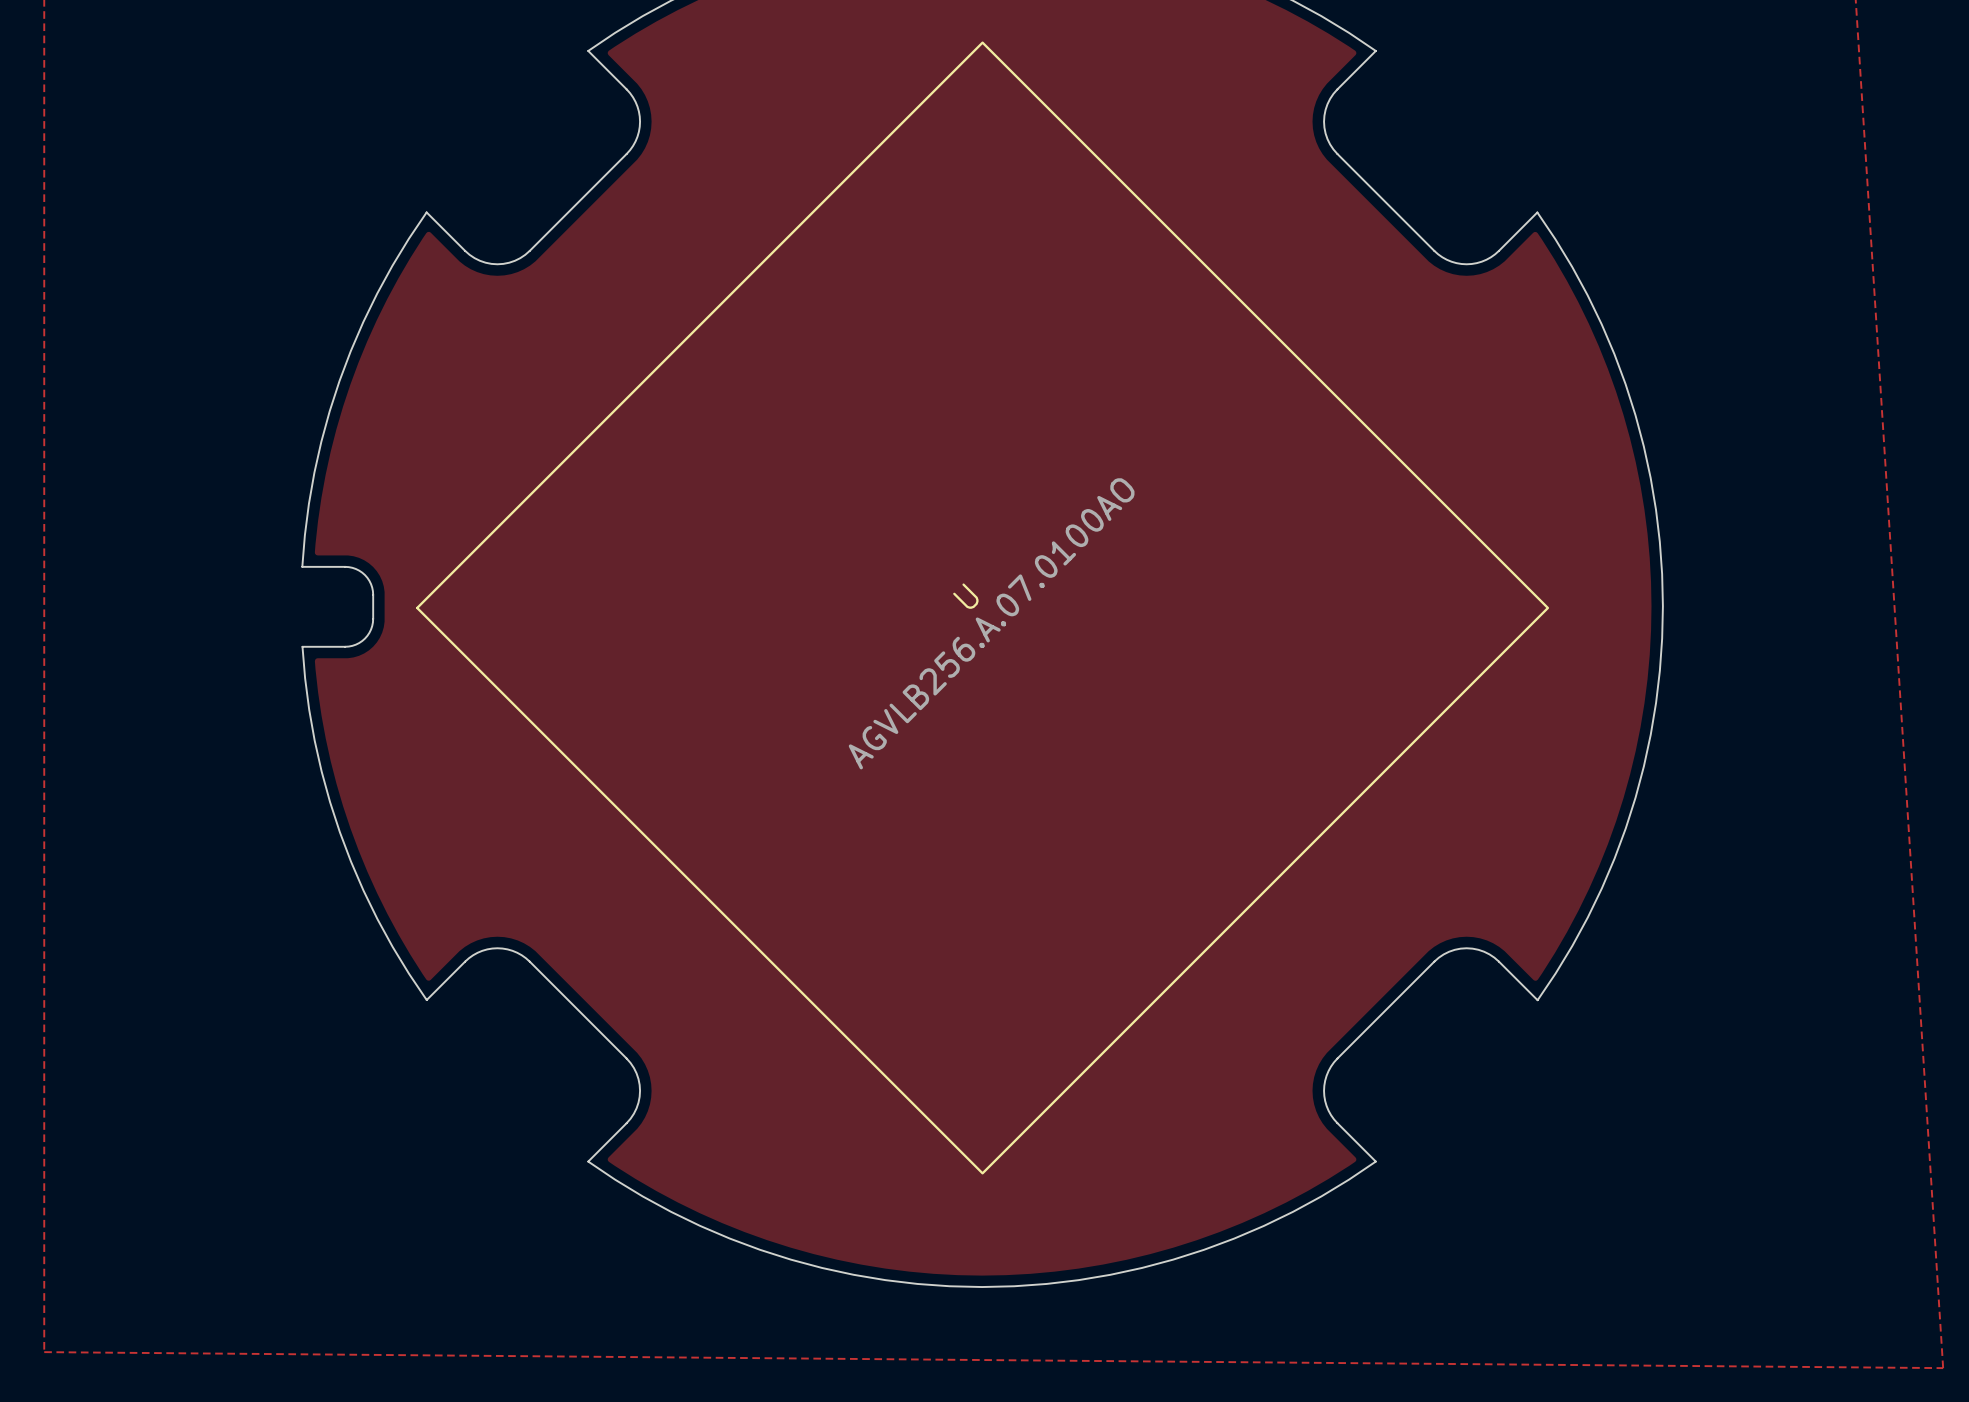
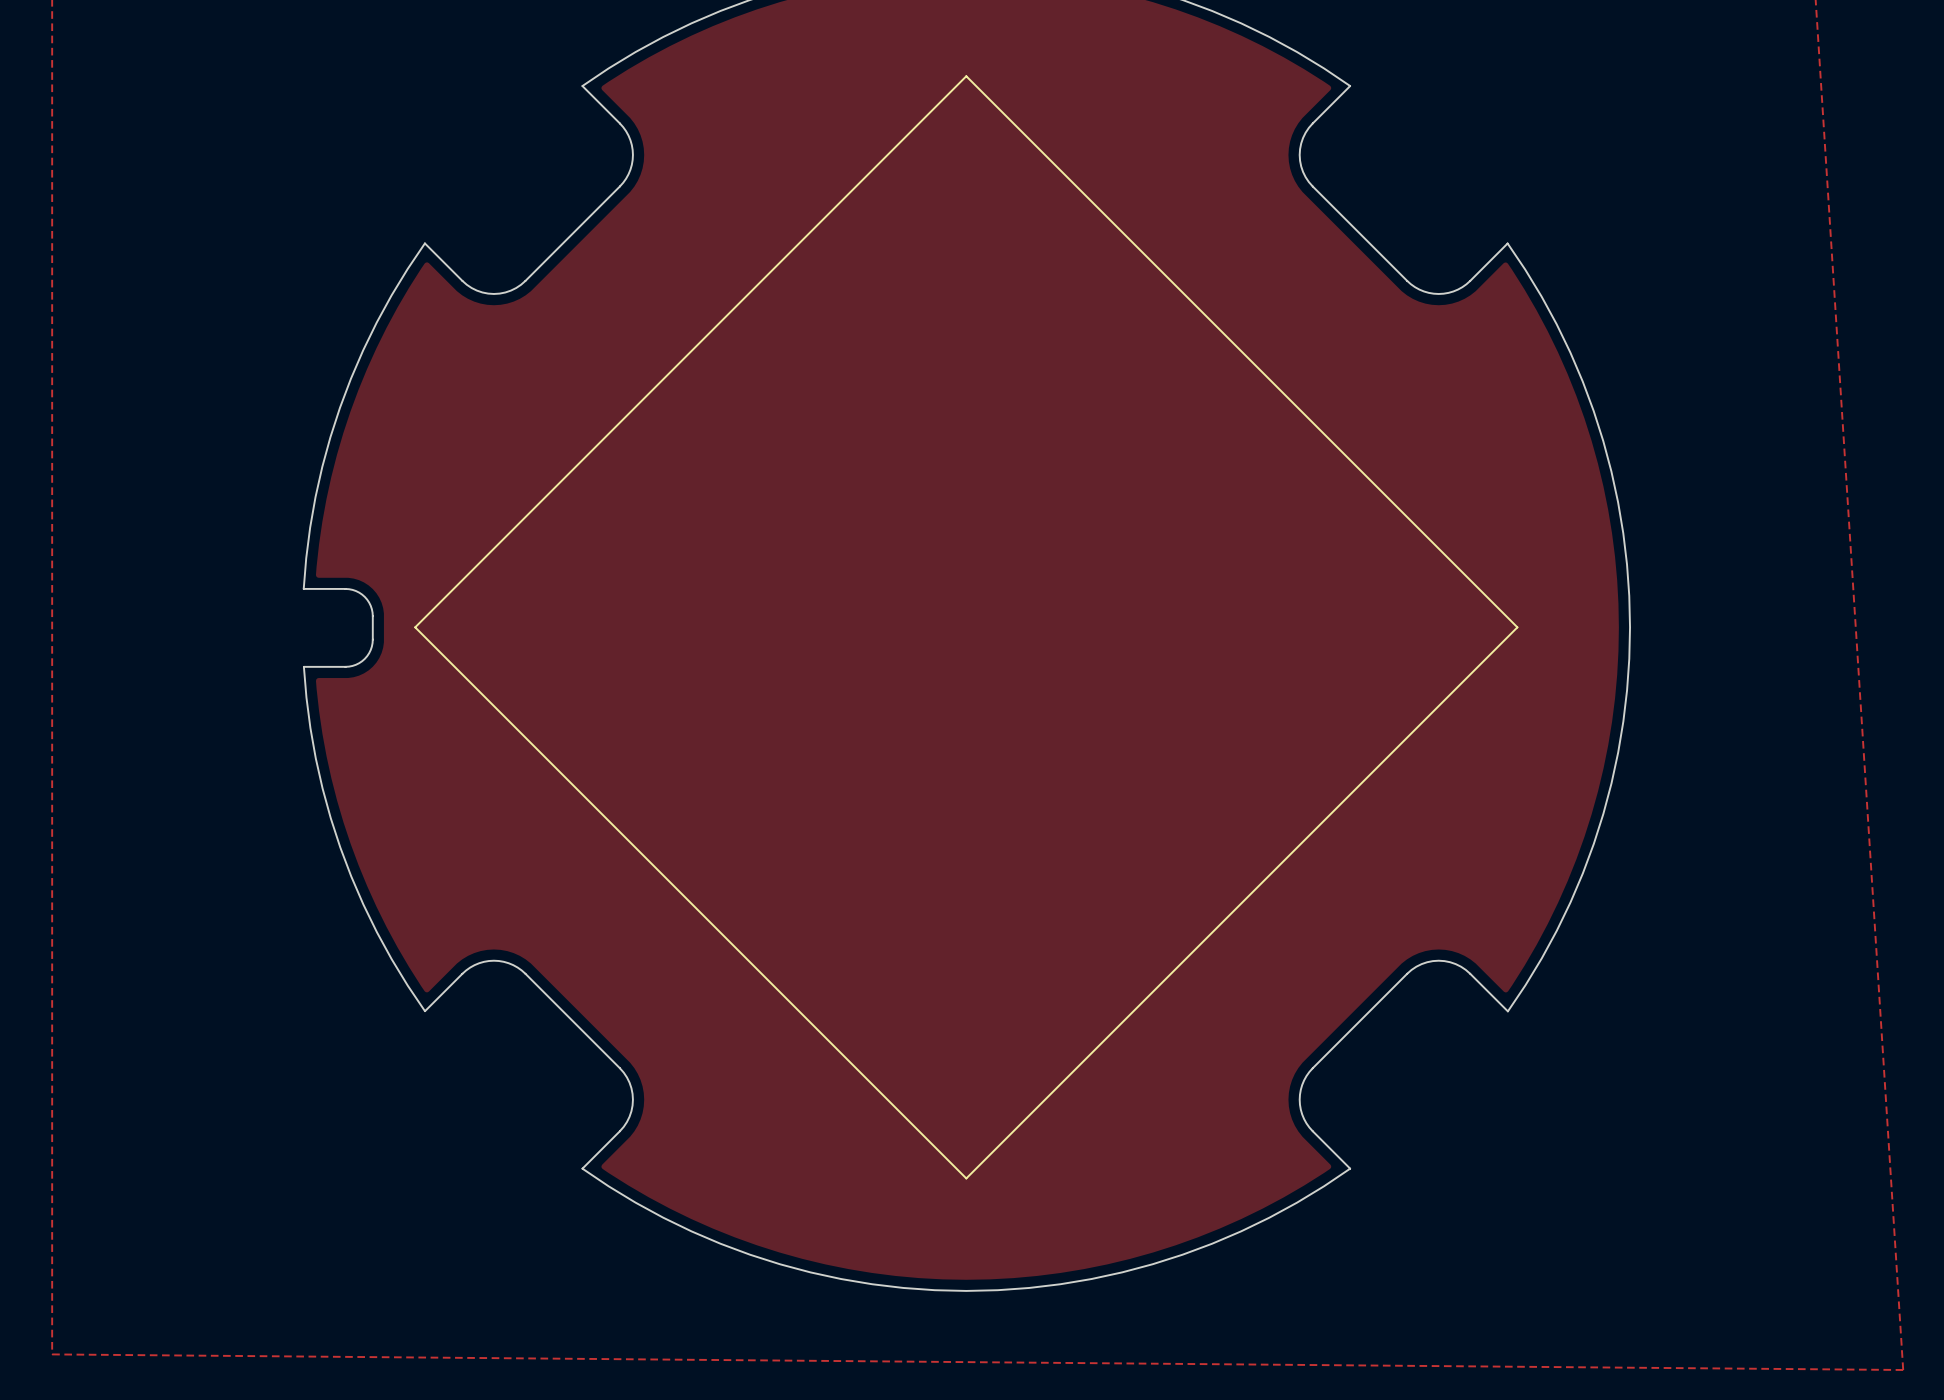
line: none -> (966, 76) (415, 627) (966, 1178) (1517, 627) (966, 76)
U: AGVLB256.A.07.0100AO (982, 607) -> none

